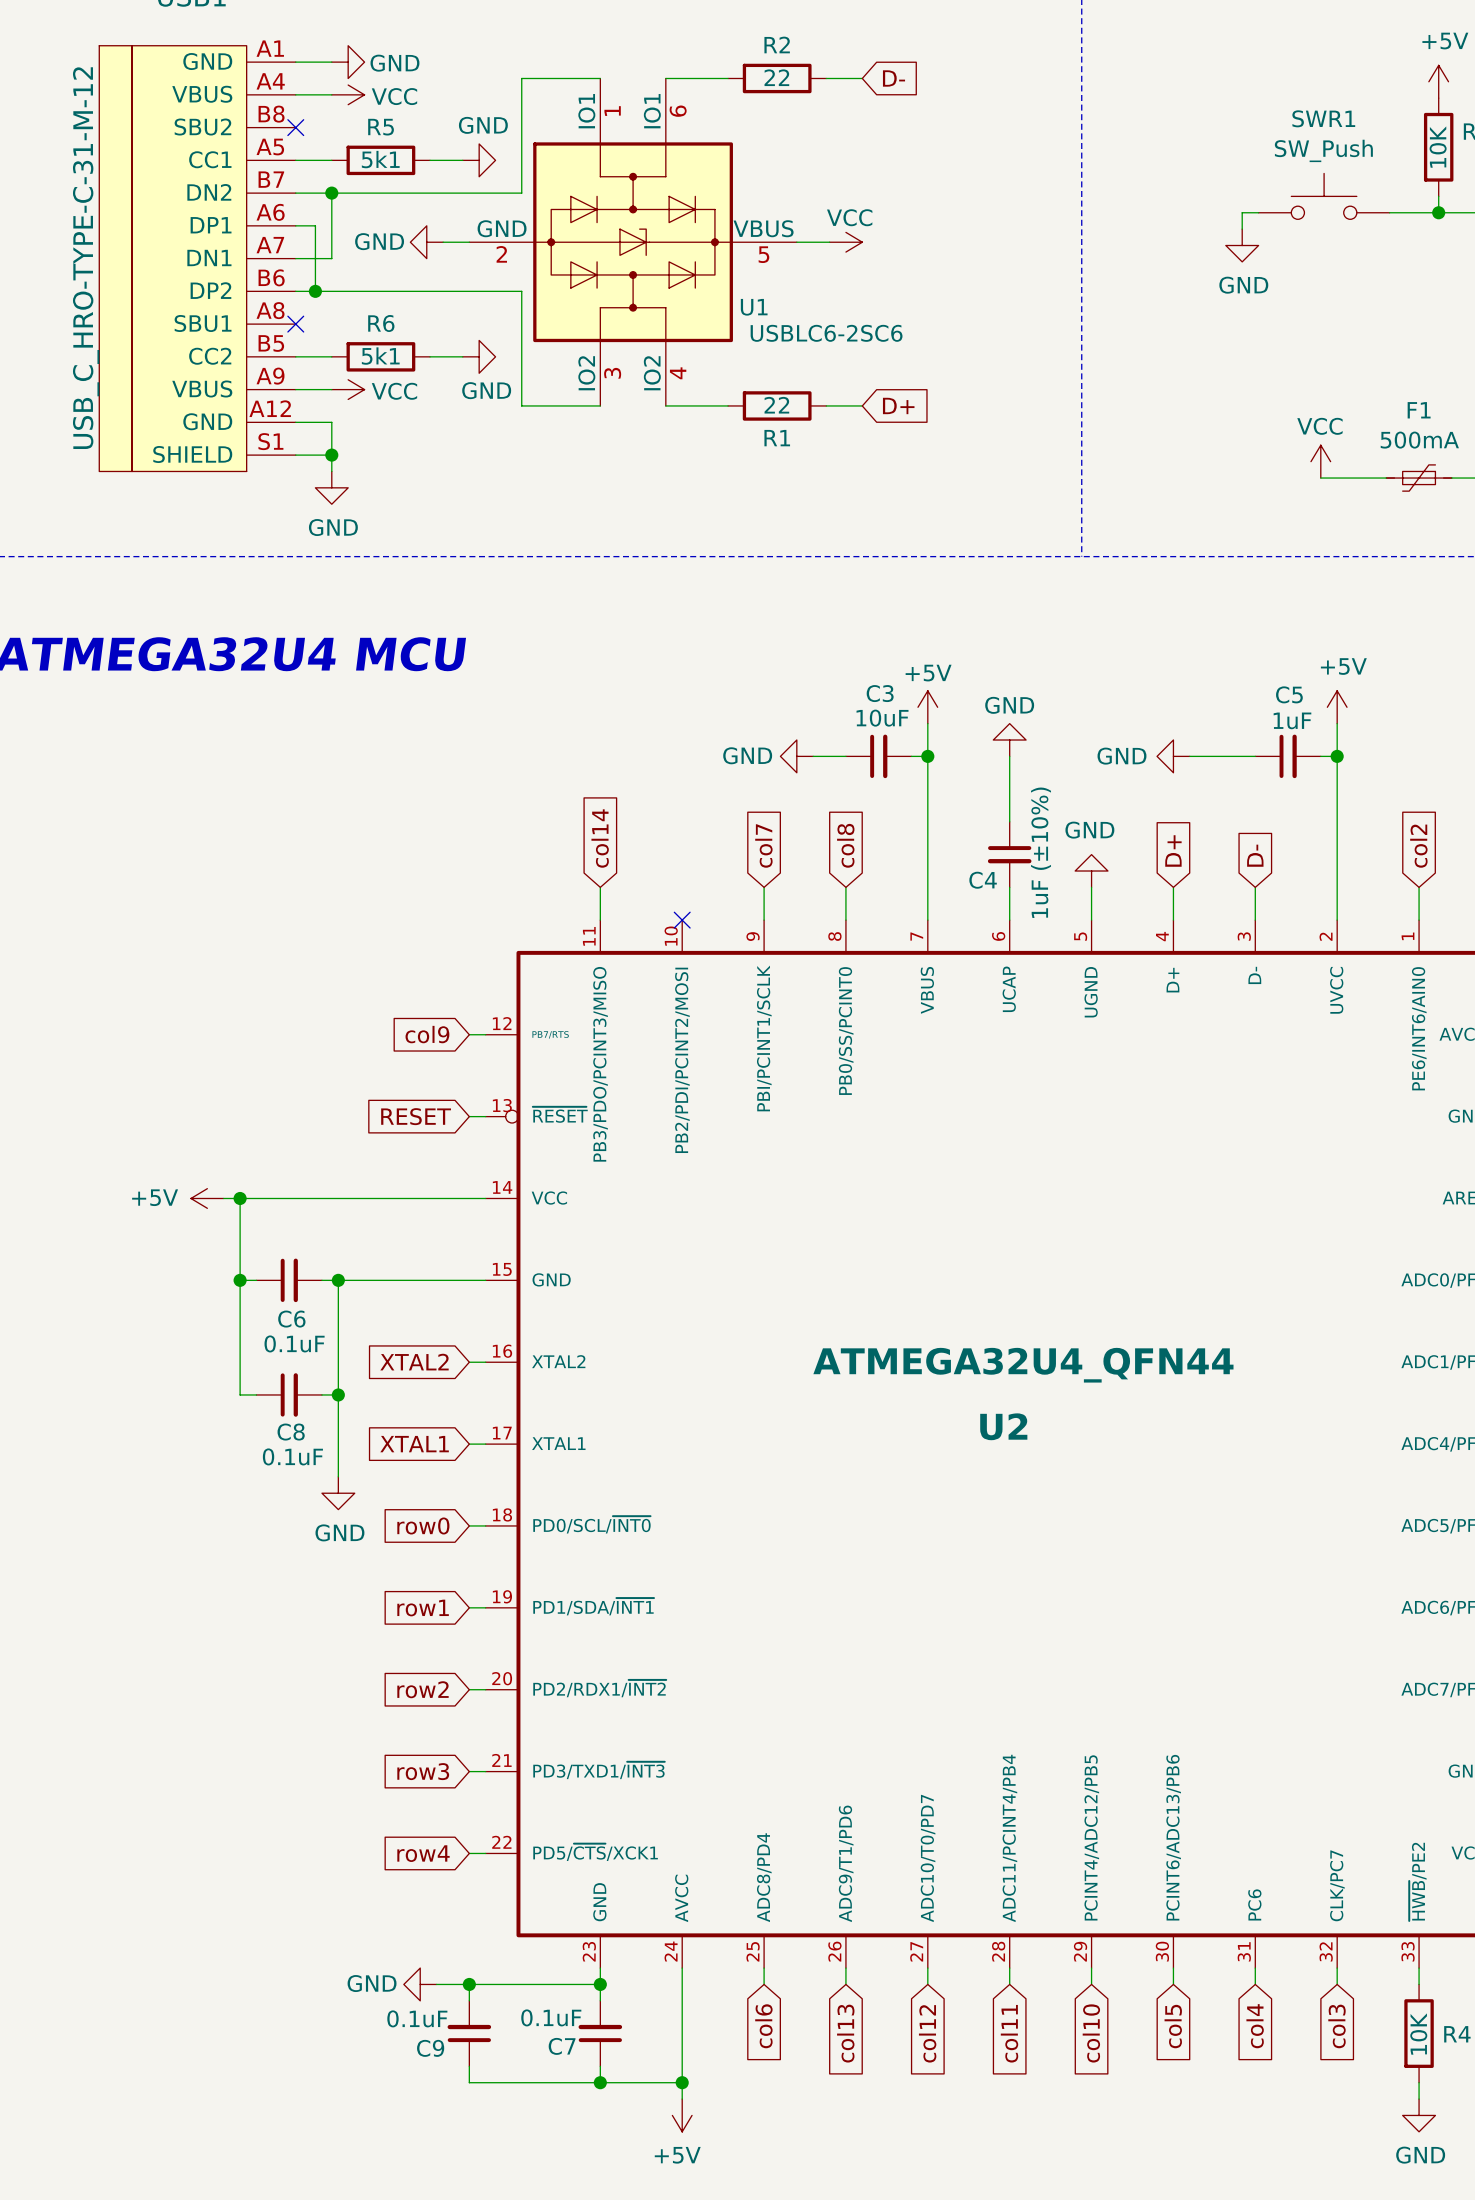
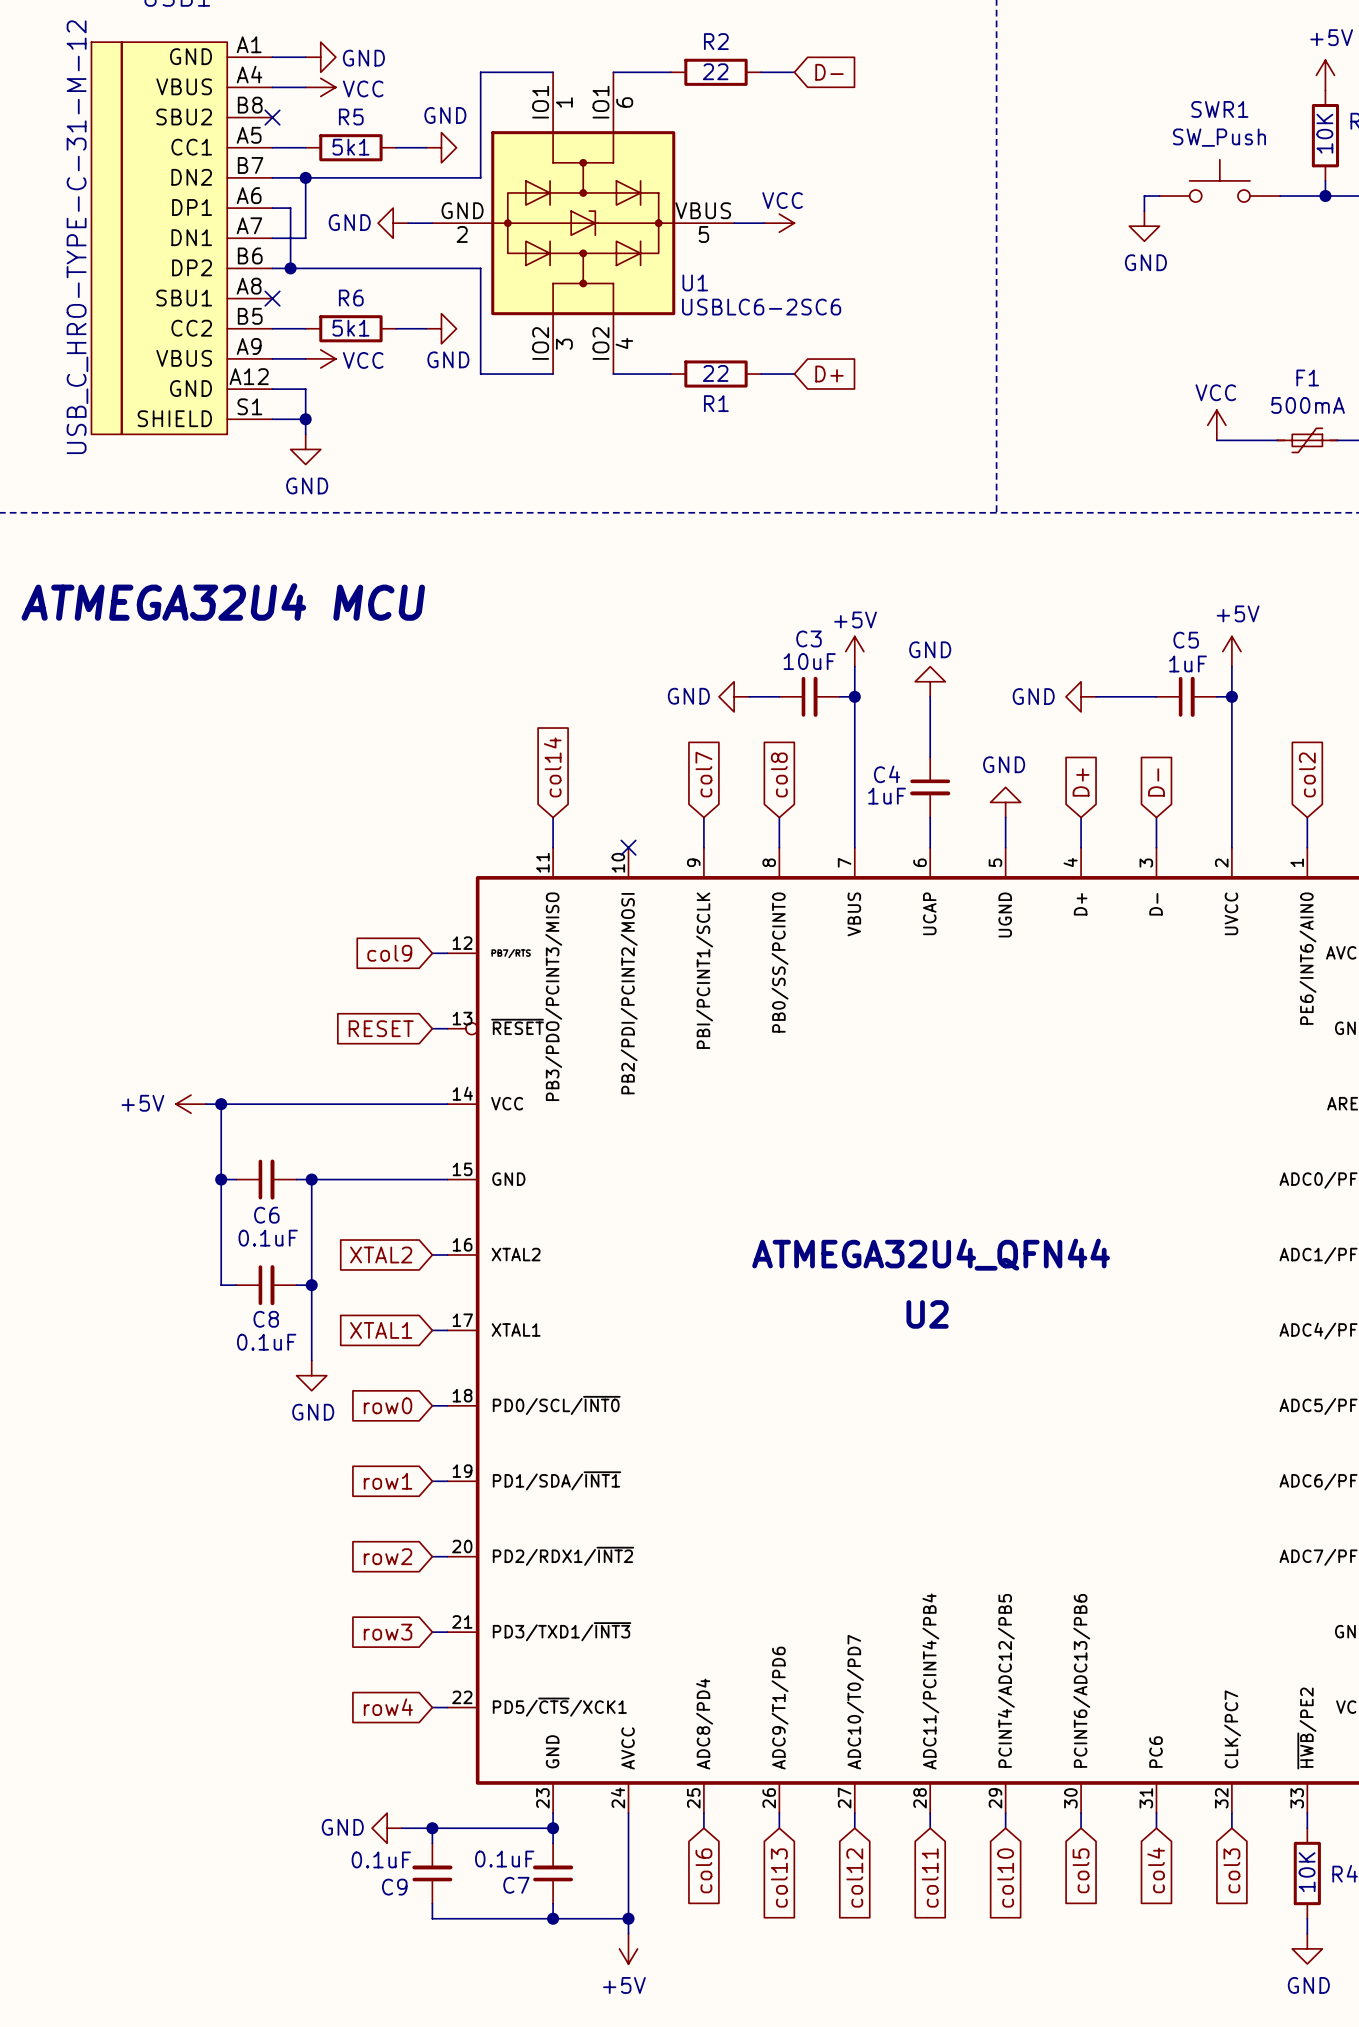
C4 value: 1uF (±10%) (1041, 852) -> 1uF (887, 796)
C4 name position: C4 (983, 880) -> C4 (887, 774)

